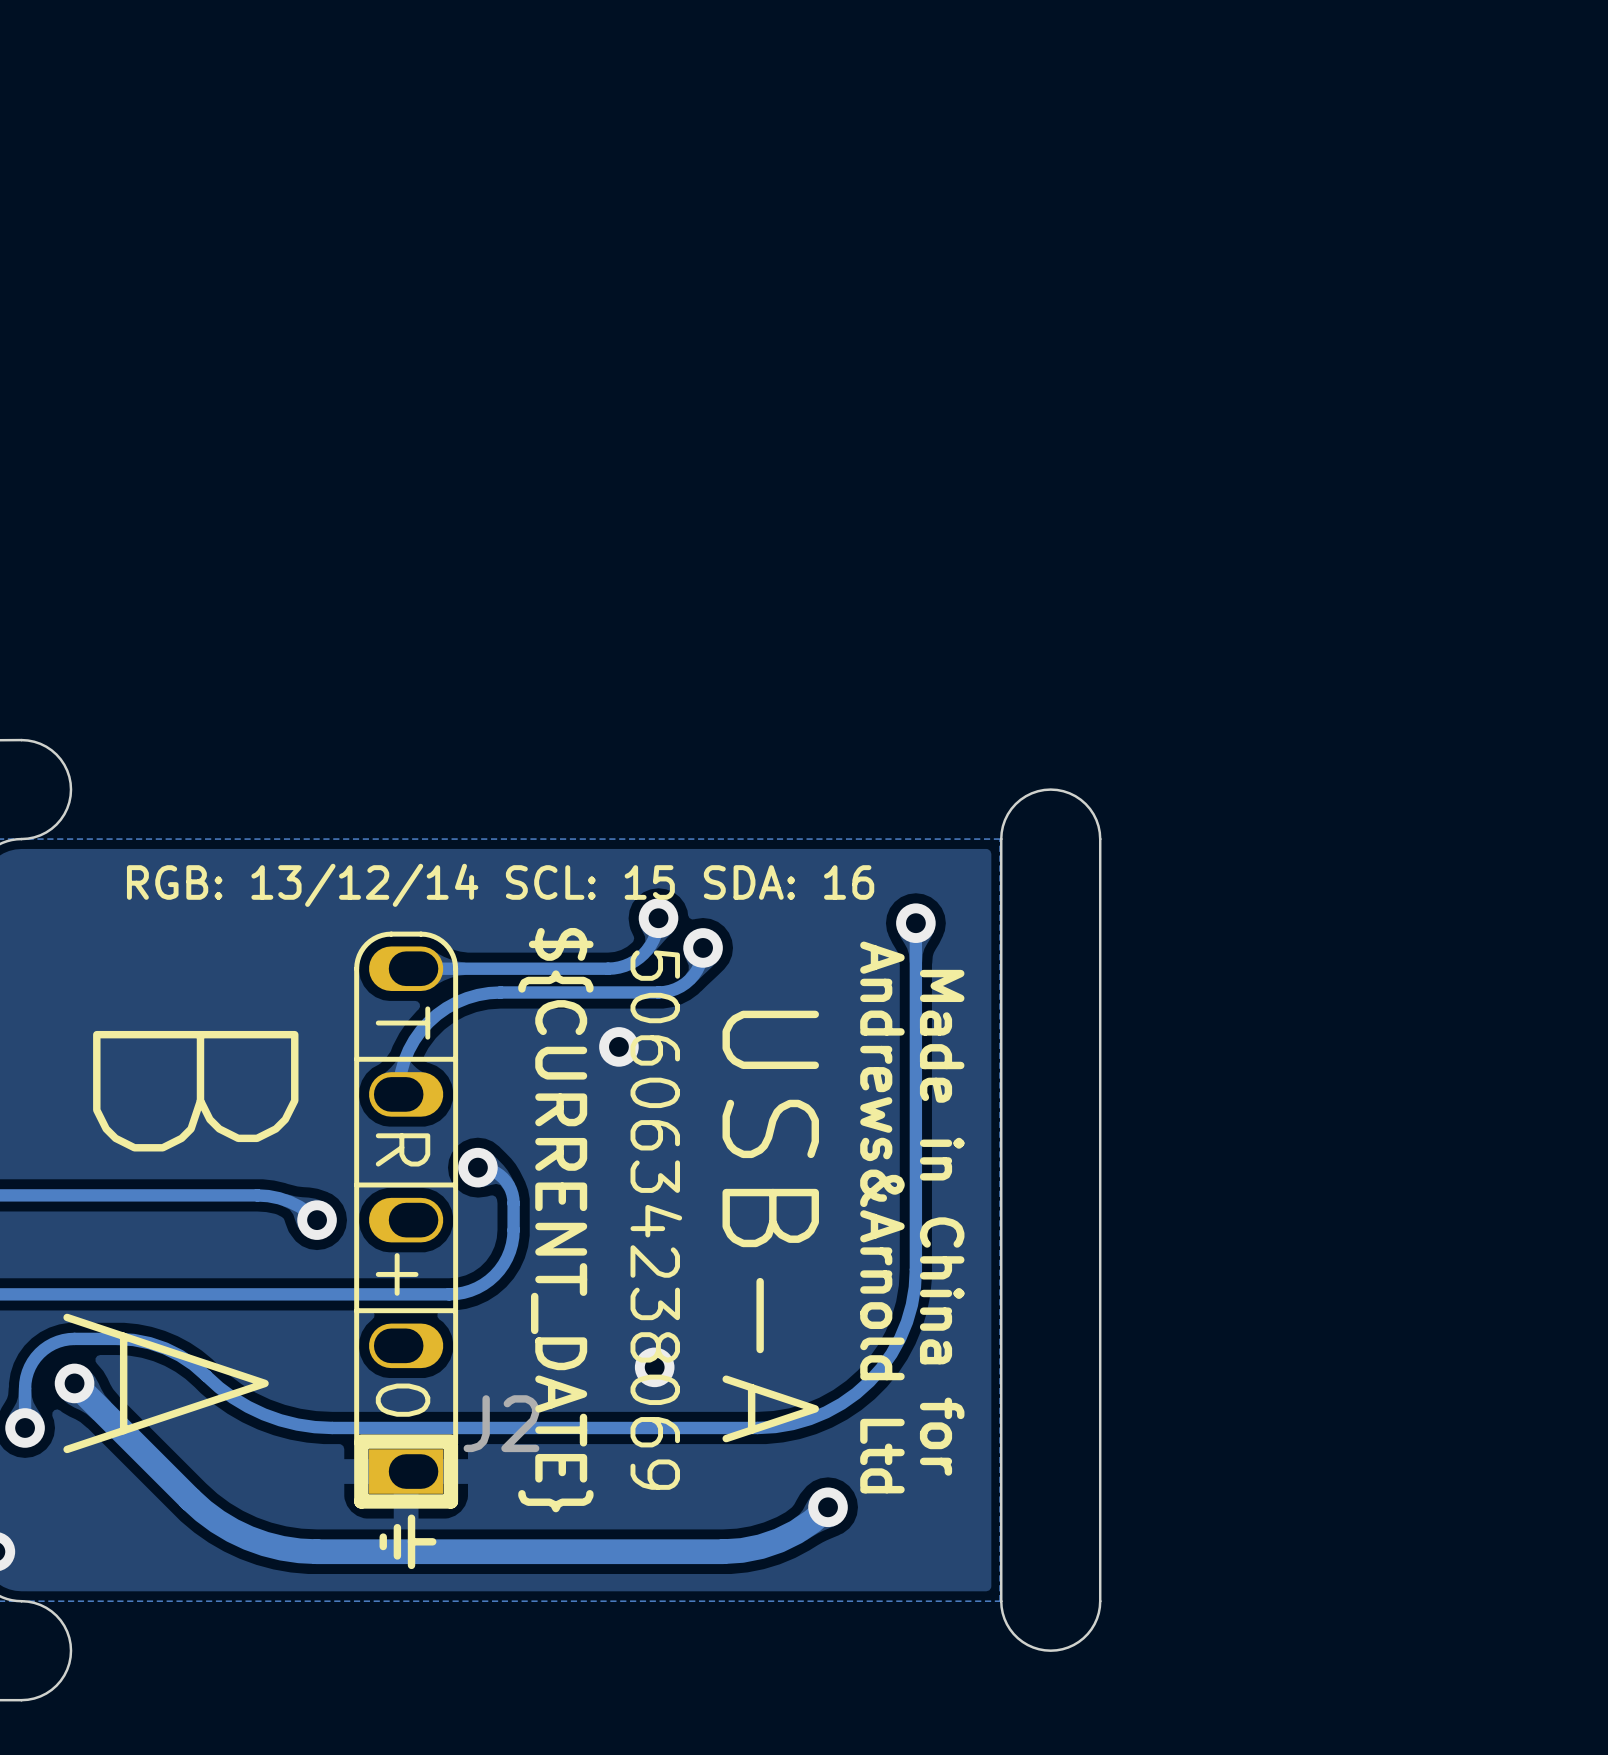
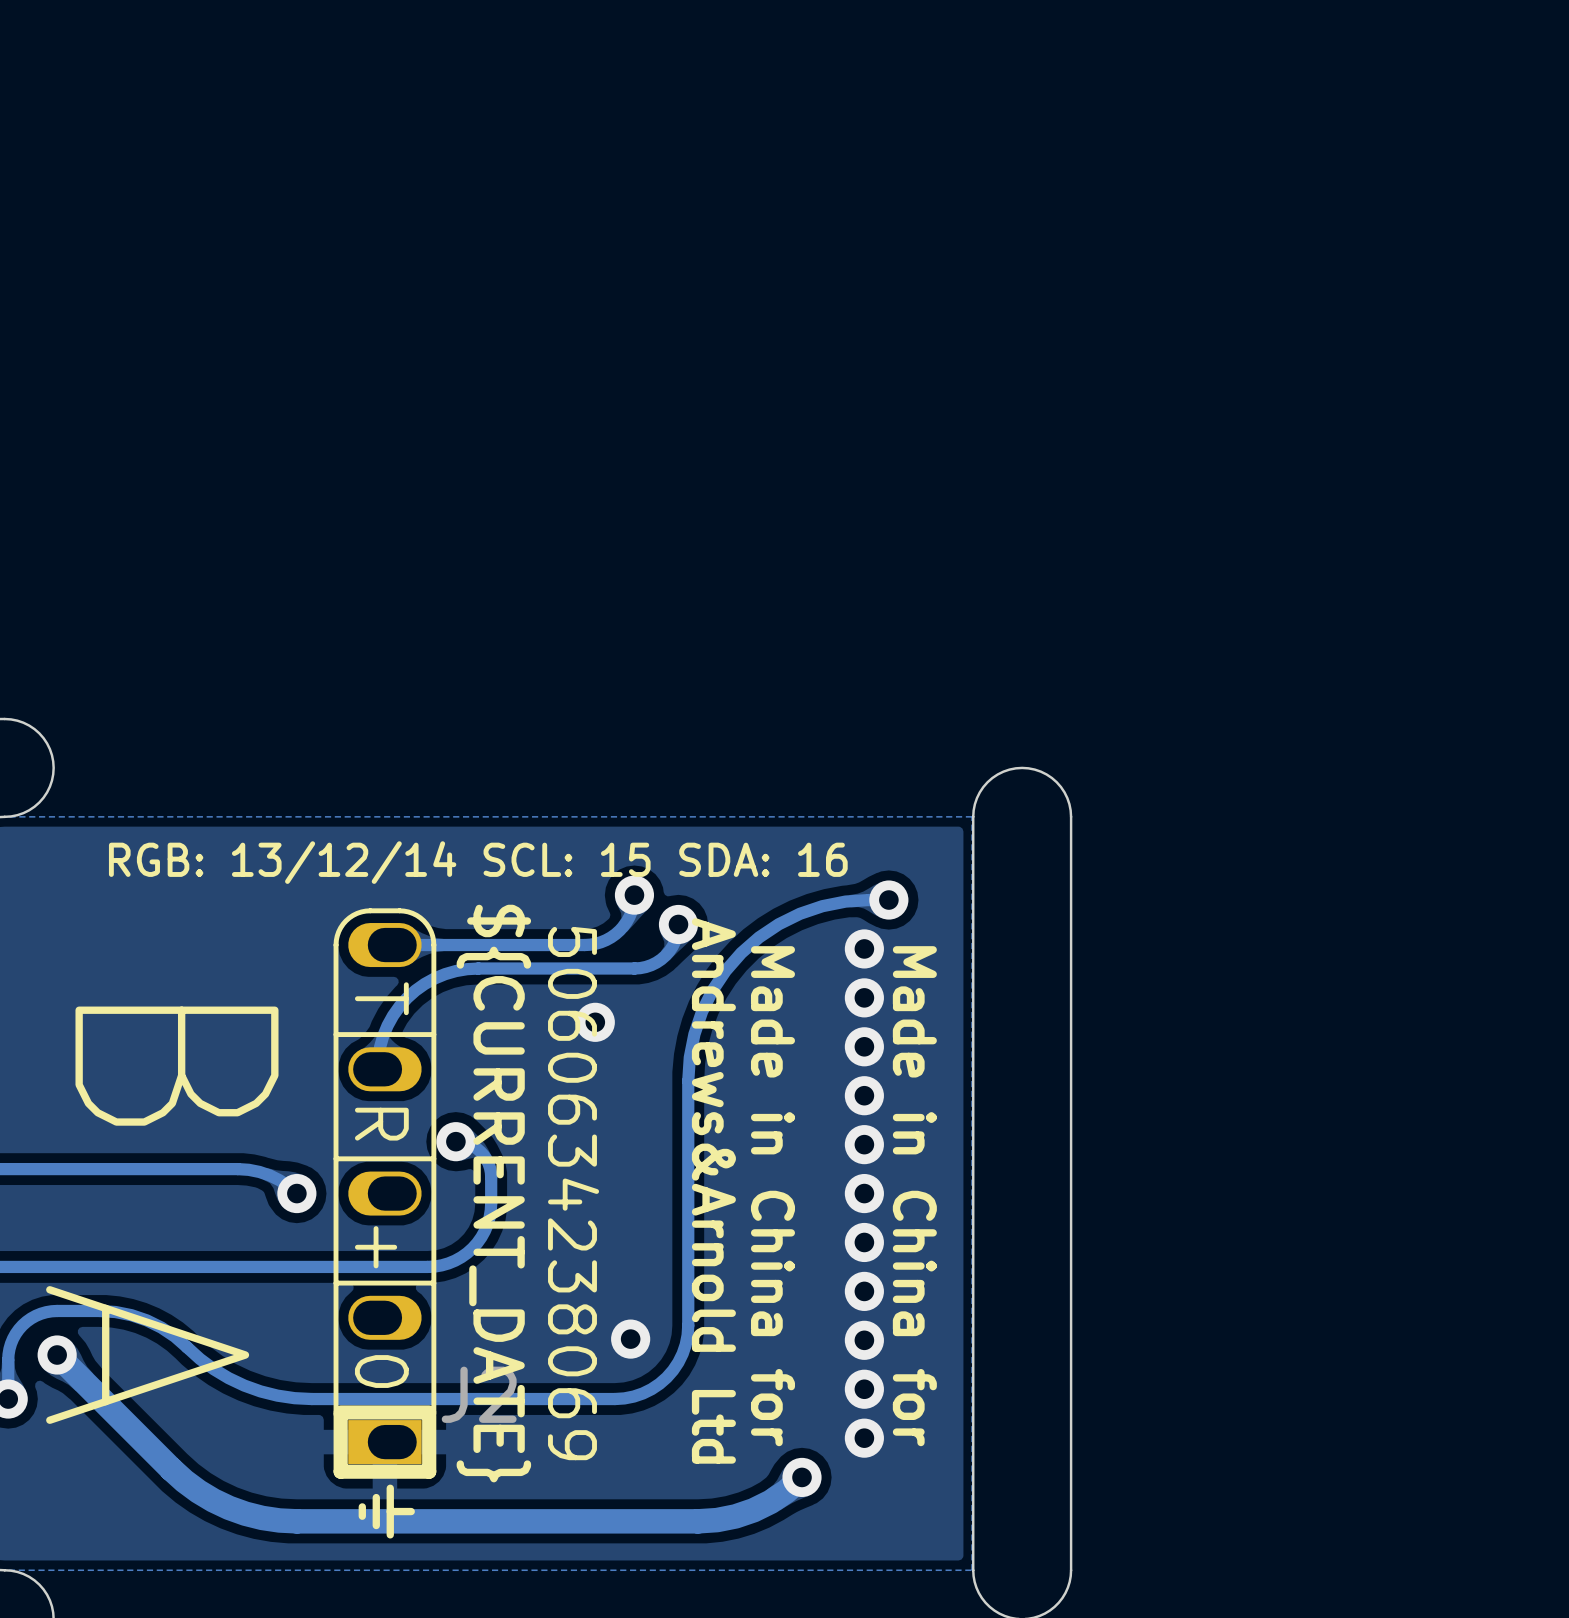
track: (915, 923) (915, 1269) (911, 1304) (900, 1338) (881, 1368) (856, 1393) (826, 1412) (809, 1419) (775, 1426) (757, 1427) (638, 1427) -> (888, 900) (845, 901) (822, 906) (800, 913) (778, 924) (759, 937) (741, 953) (725, 970) (712, 990) (702, 1011) (694, 1034) (689, 1057) (688, 1325) (685, 1344) (678, 1362) (659, 1383) (633, 1396) (614, 1399)
via: none -> (864, 948)
via: none -> (864, 997)
via: none -> (864, 1046)
via: none -> (864, 1095)
via: none -> (864, 1144)
text position: Andrews&Arnold Ltd (882, 1217) -> Andrews&Arnold Ltd (713, 1190)
text position: ${CURRENT_DATE} (555, 1220) -> ${CURRENT_DATE} (493, 1193)
text position: 5060634238069 (656, 1220) -> 5060634238069 (573, 1193)
via: none -> (864, 1193)
text: USB-A (770, 1226) -> Made in China for (772, 1196)
via: none -> (864, 1242)
via: none -> (864, 1291)
via: none -> (864, 1340)
via: none -> (864, 1389)
via: none -> (864, 1438)

